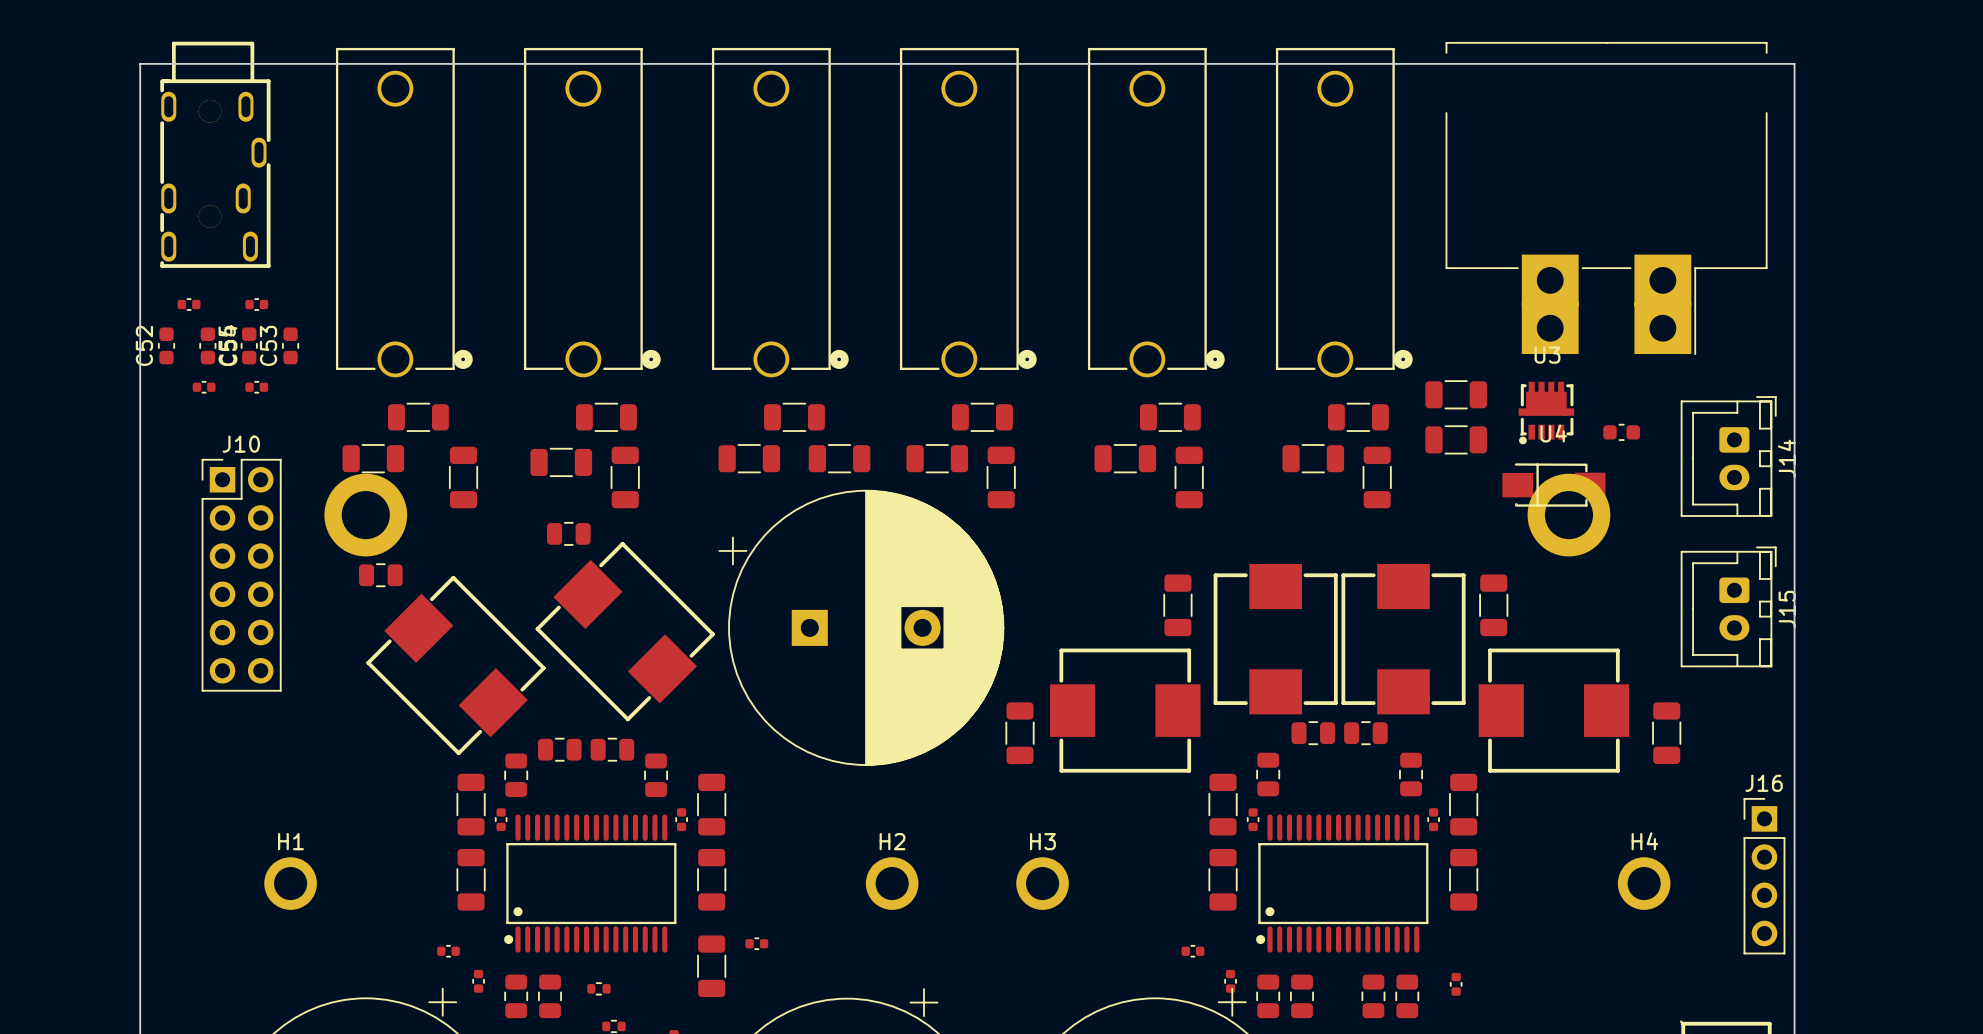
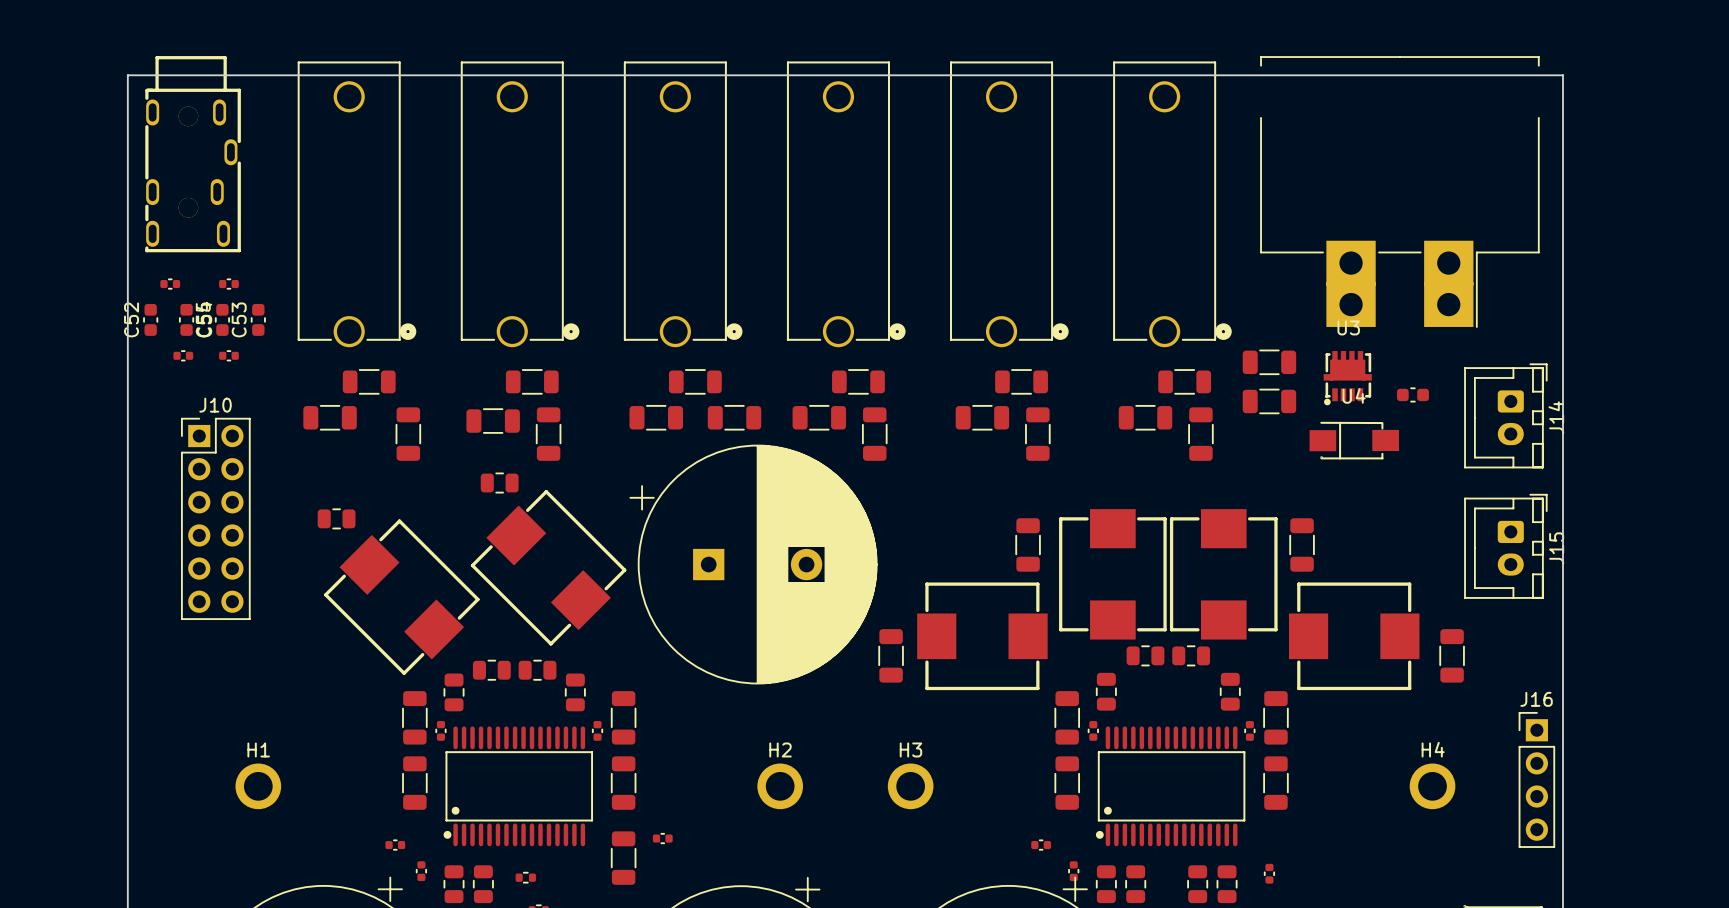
part: (365, 515) -> none
part: (1568, 515) -> none

